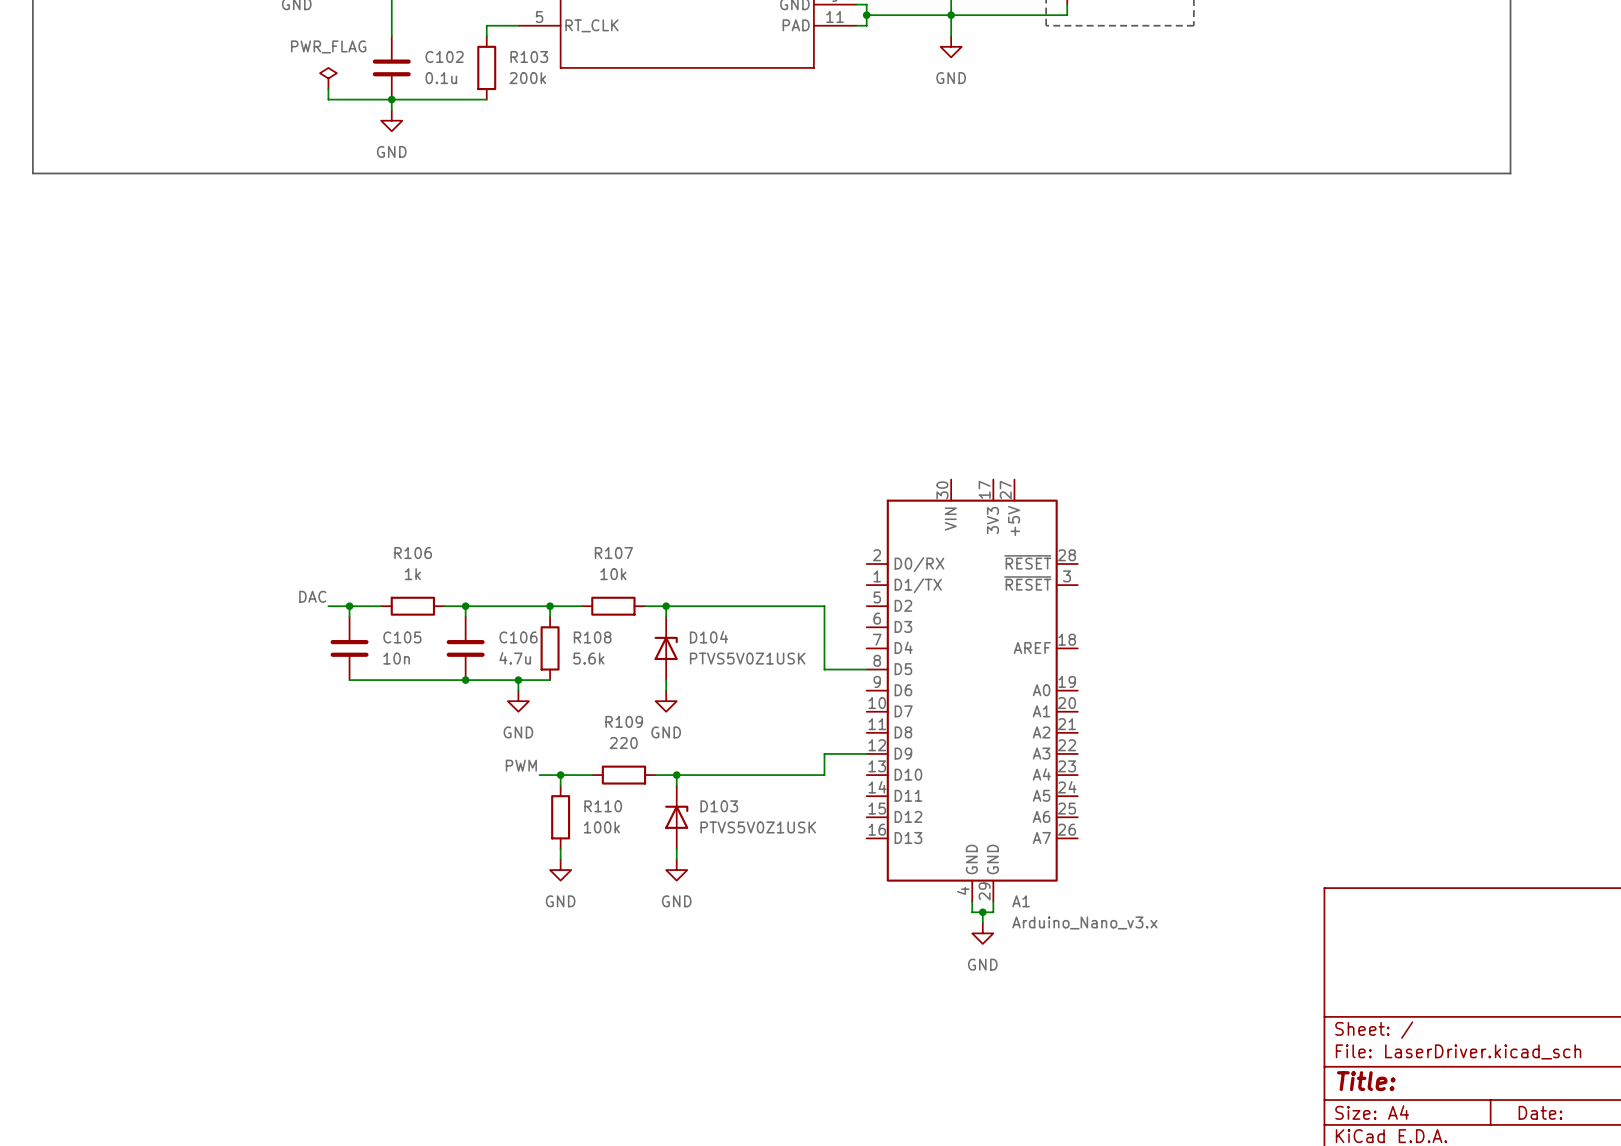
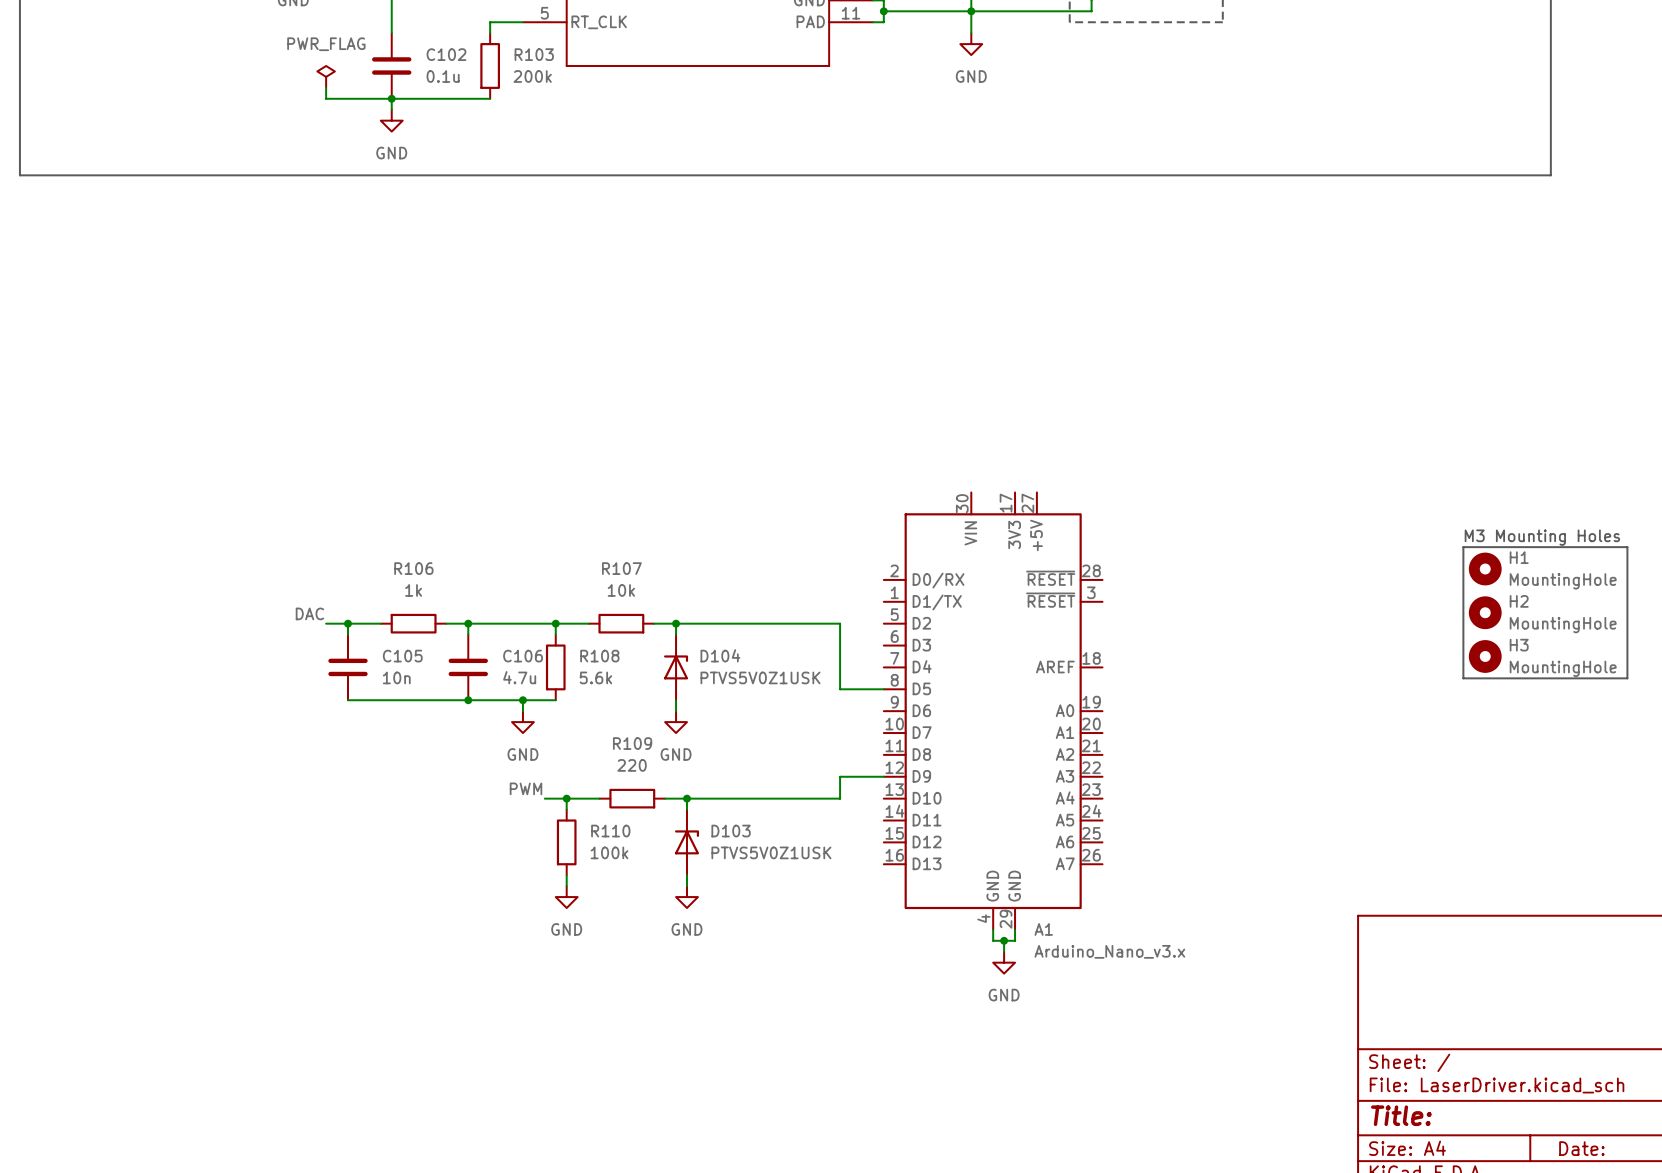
text: none -> M3 Mounting Holes (1542, 537)
line: none -> (1463, 547) (1627, 547) (1627, 678) (1463, 678) (1463, 547)
H1: none -> MountingHole (1485, 569)
H2: none -> MountingHole (1485, 612)
H3: none -> MountingHole (1485, 656)

